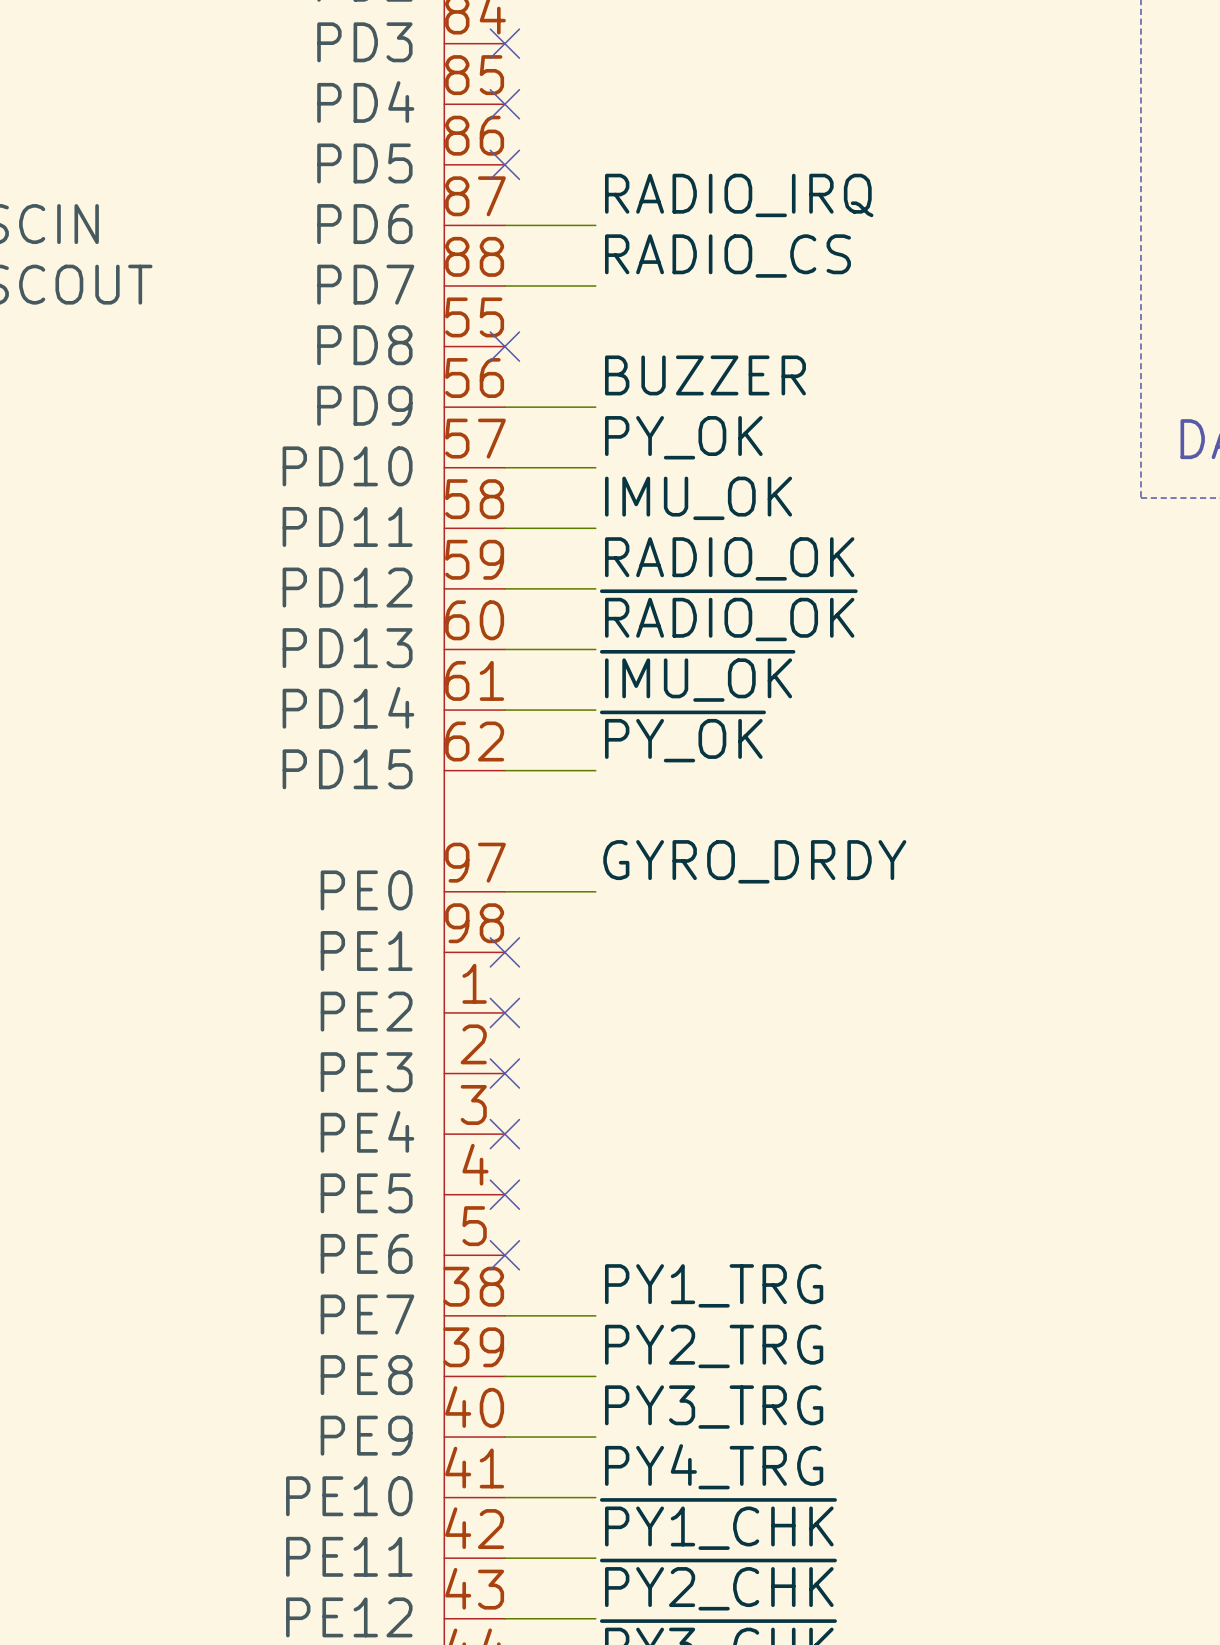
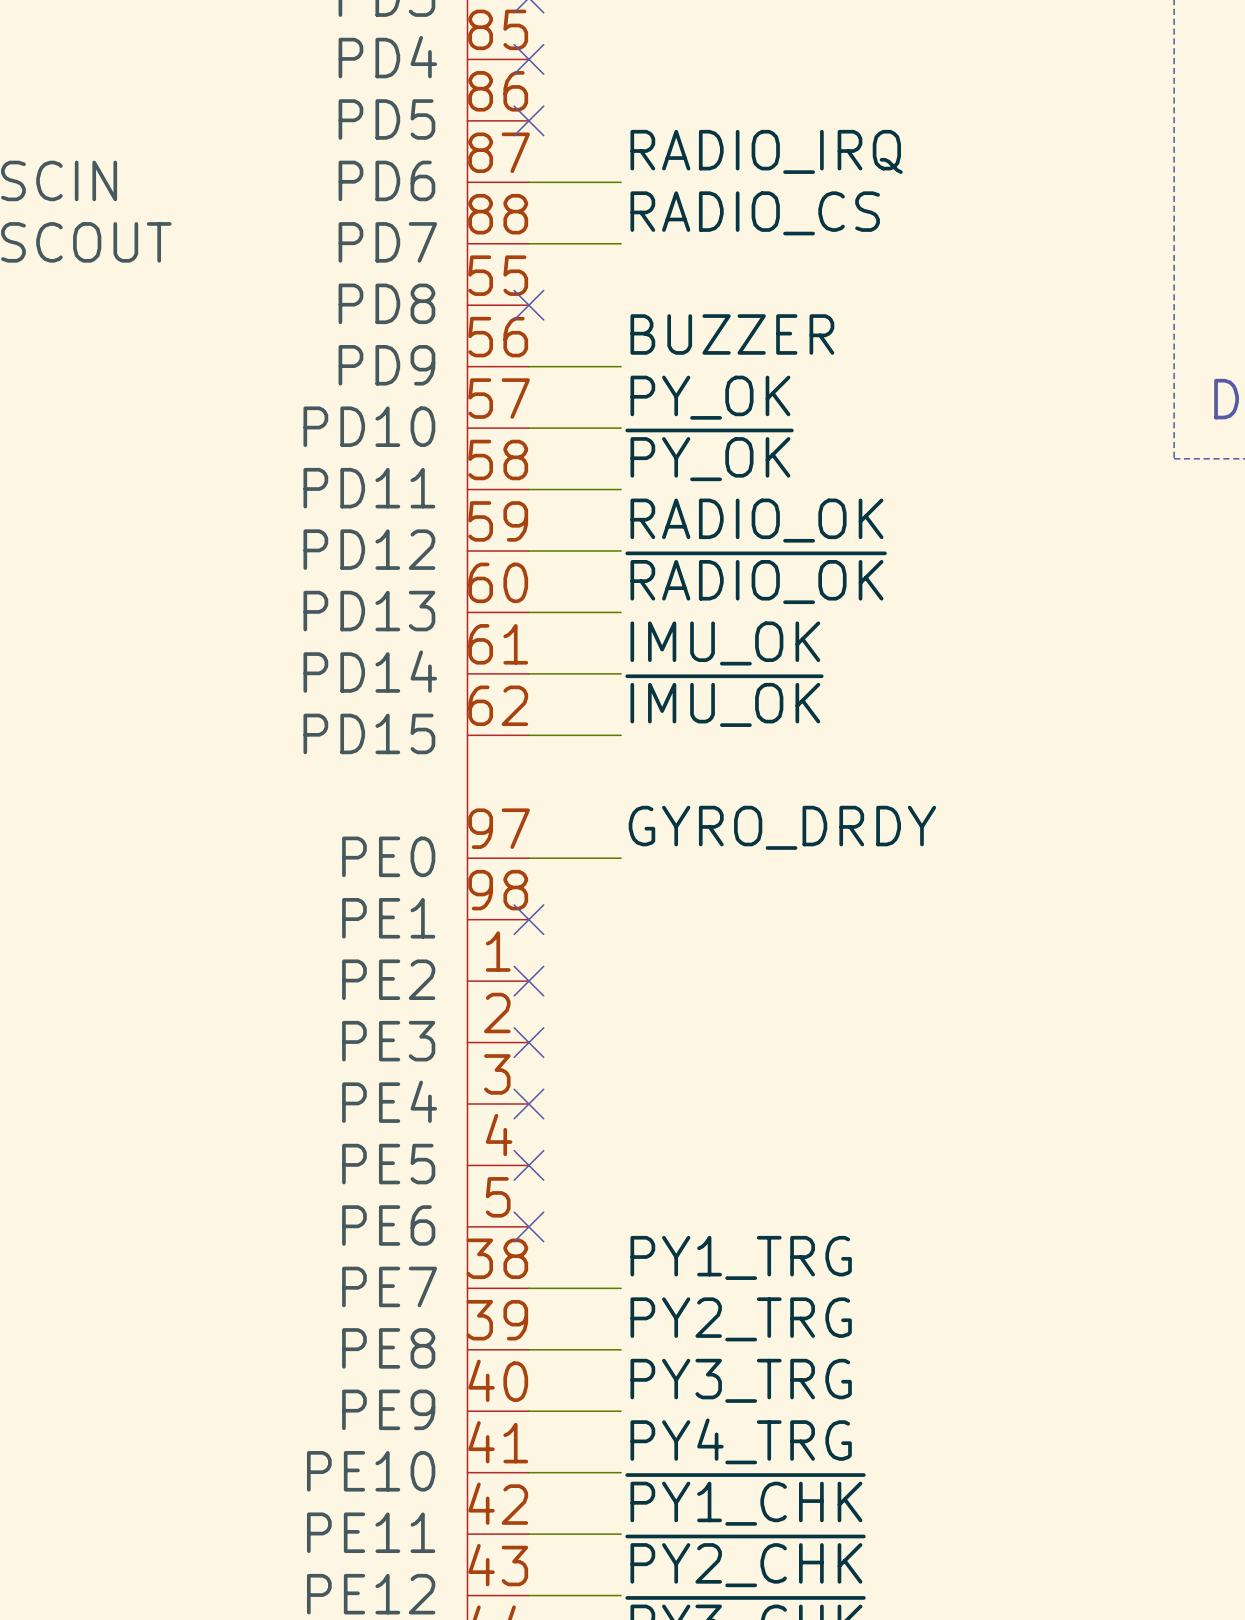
label: IMU_OK (698, 498) -> ~{PY_OK} (709, 454)
label: ~{IMU_OK} (697, 675) -> IMU_OK (725, 643)
label: ~{PY_OK} (682, 736) -> ~{IMU_OK} (724, 700)

